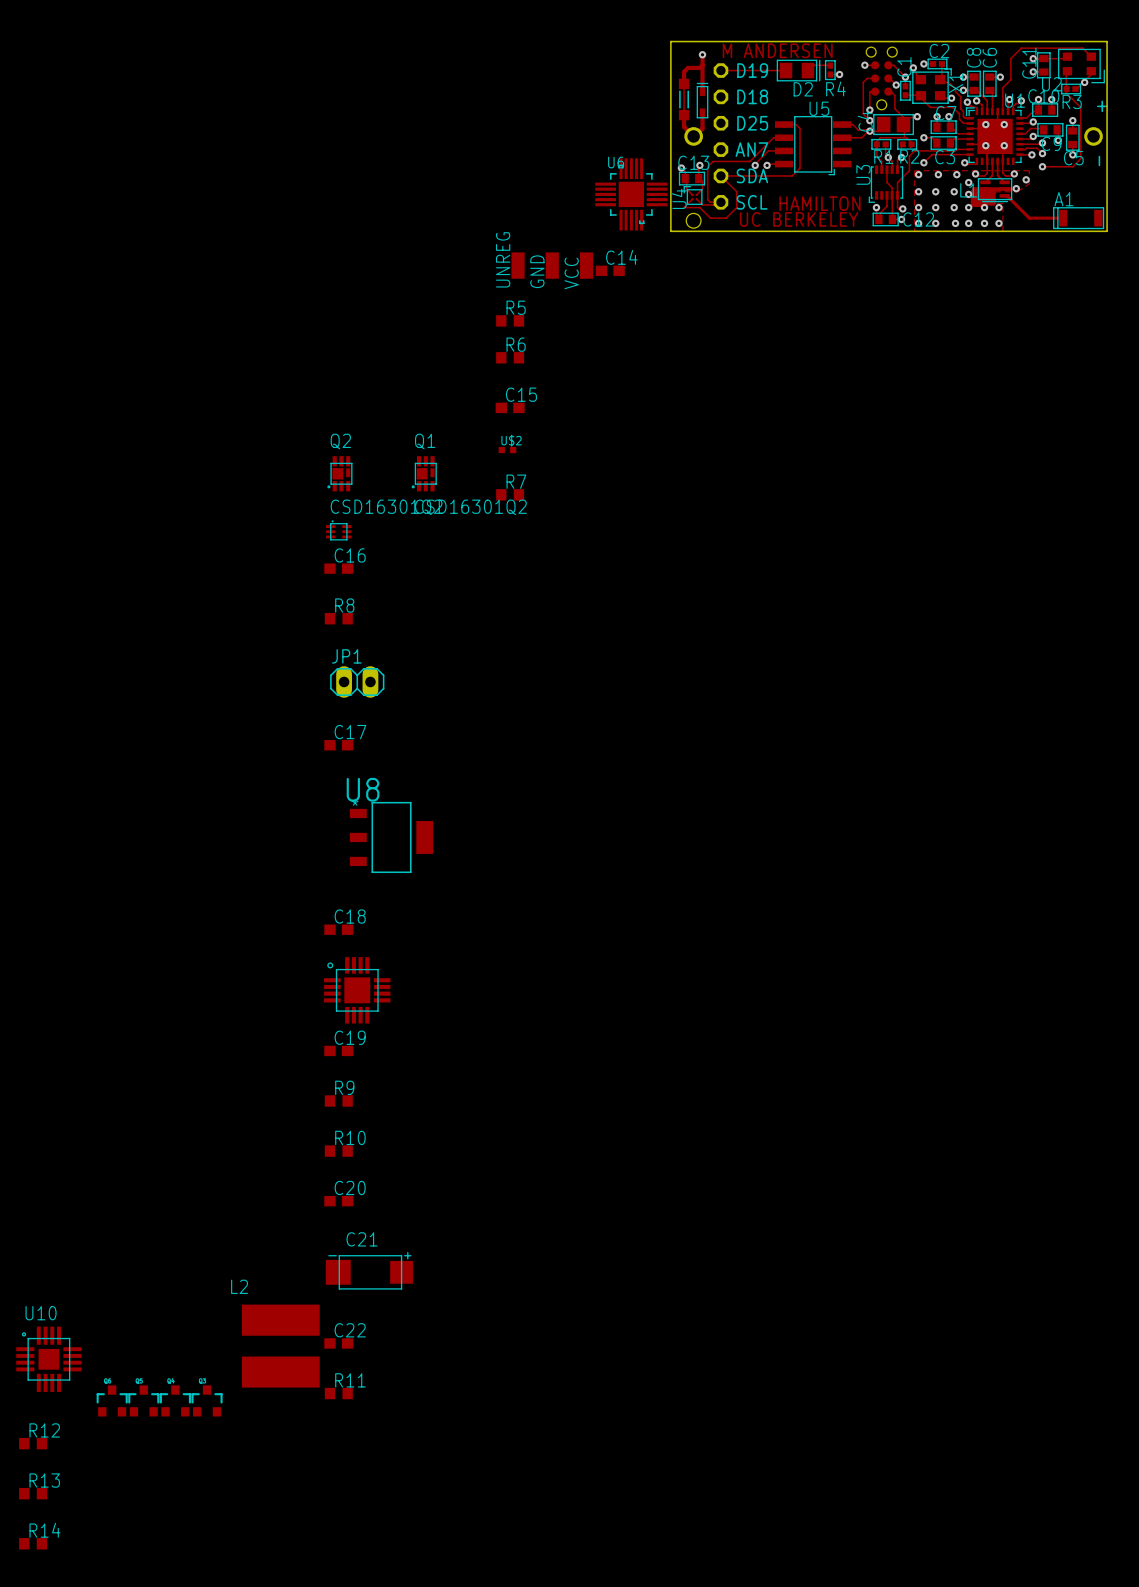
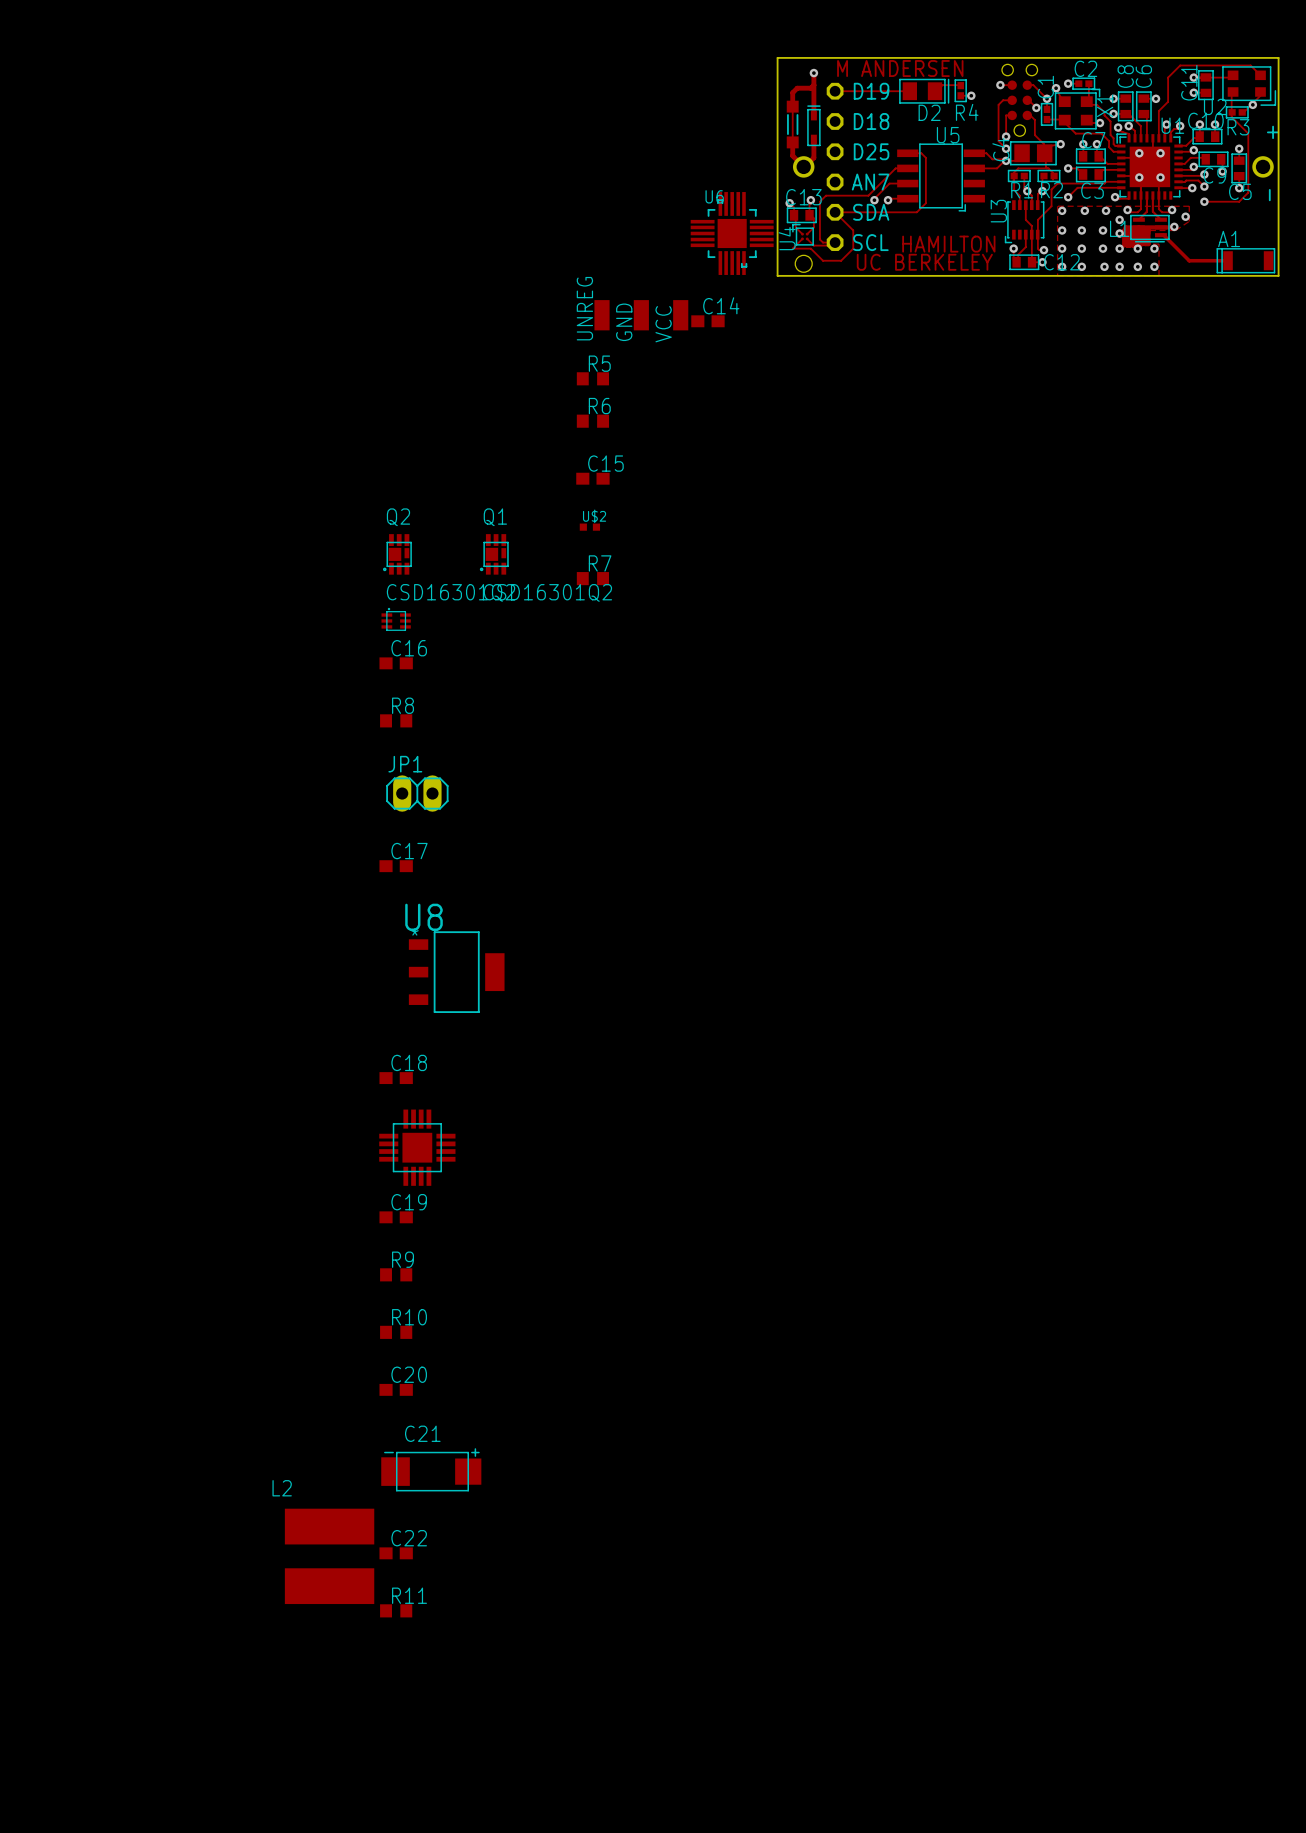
part footprint: [324, 957, 391, 1024] -> [379, 1109, 456, 1186]
U10: (48, 1359) -> none
part: (112, 1400) -> none
part: (143, 1400) -> none
part: (175, 1400) -> none
part: (207, 1400) -> none
R12: (33, 1443) -> none
R13: (33, 1493) -> none
R14: (33, 1543) -> none

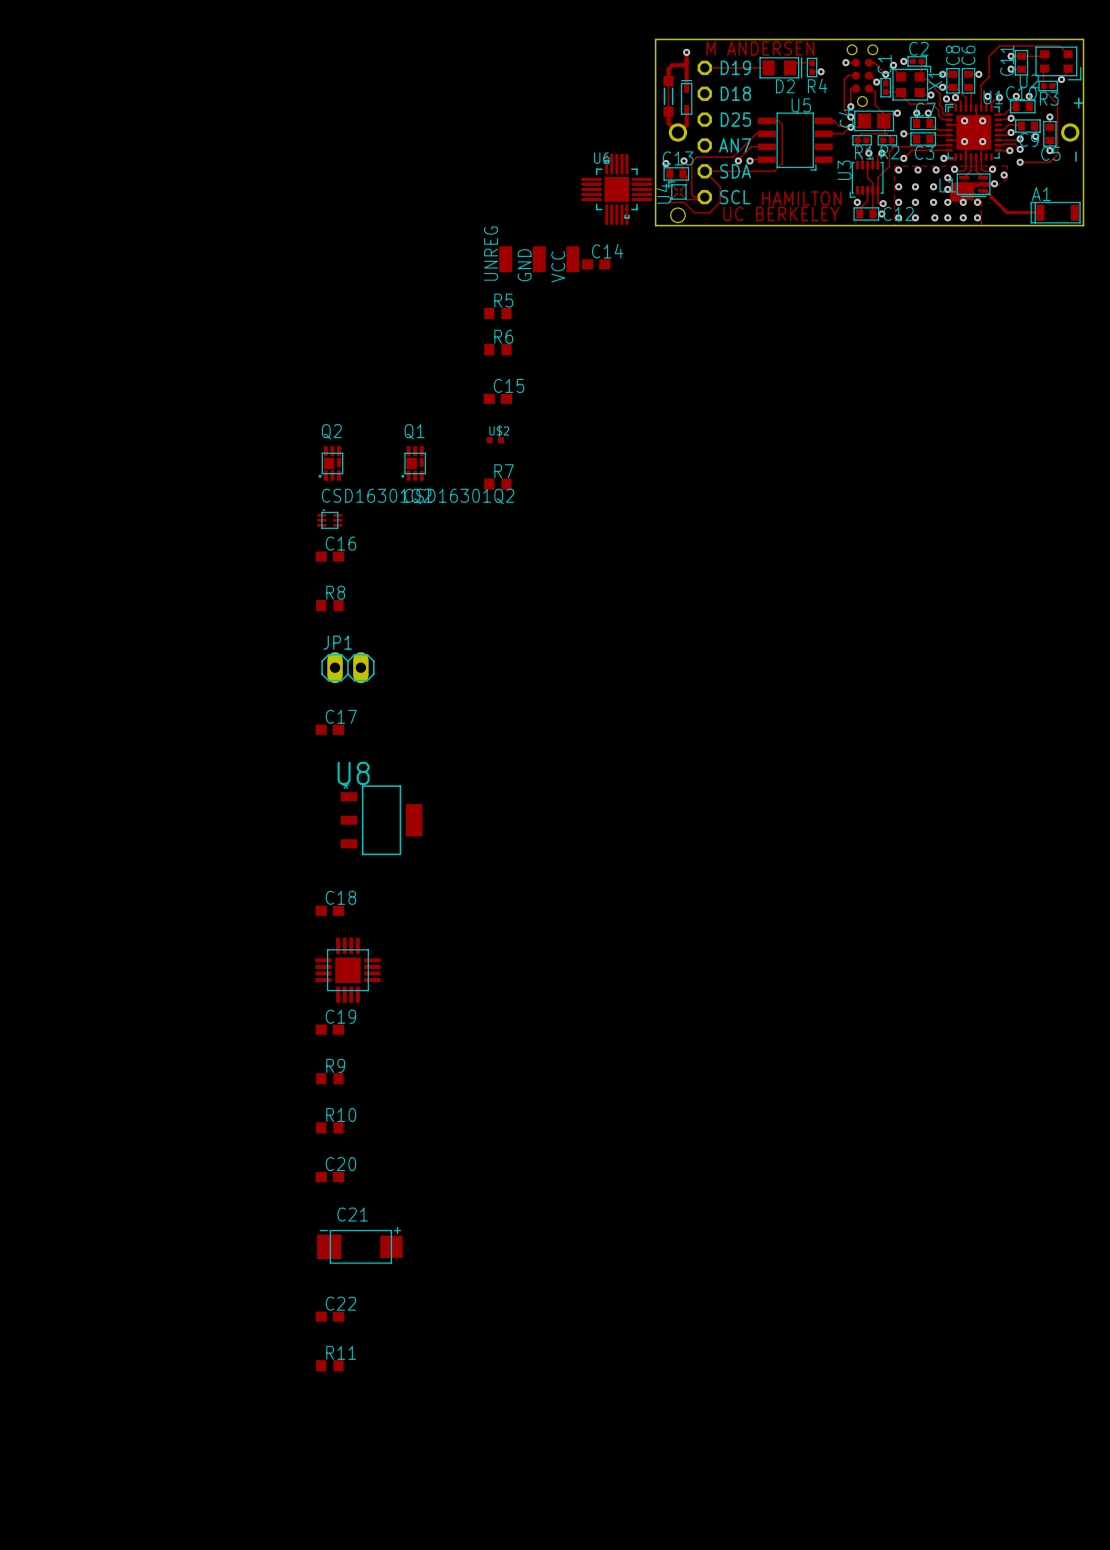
L2: (329, 1556) -> none

